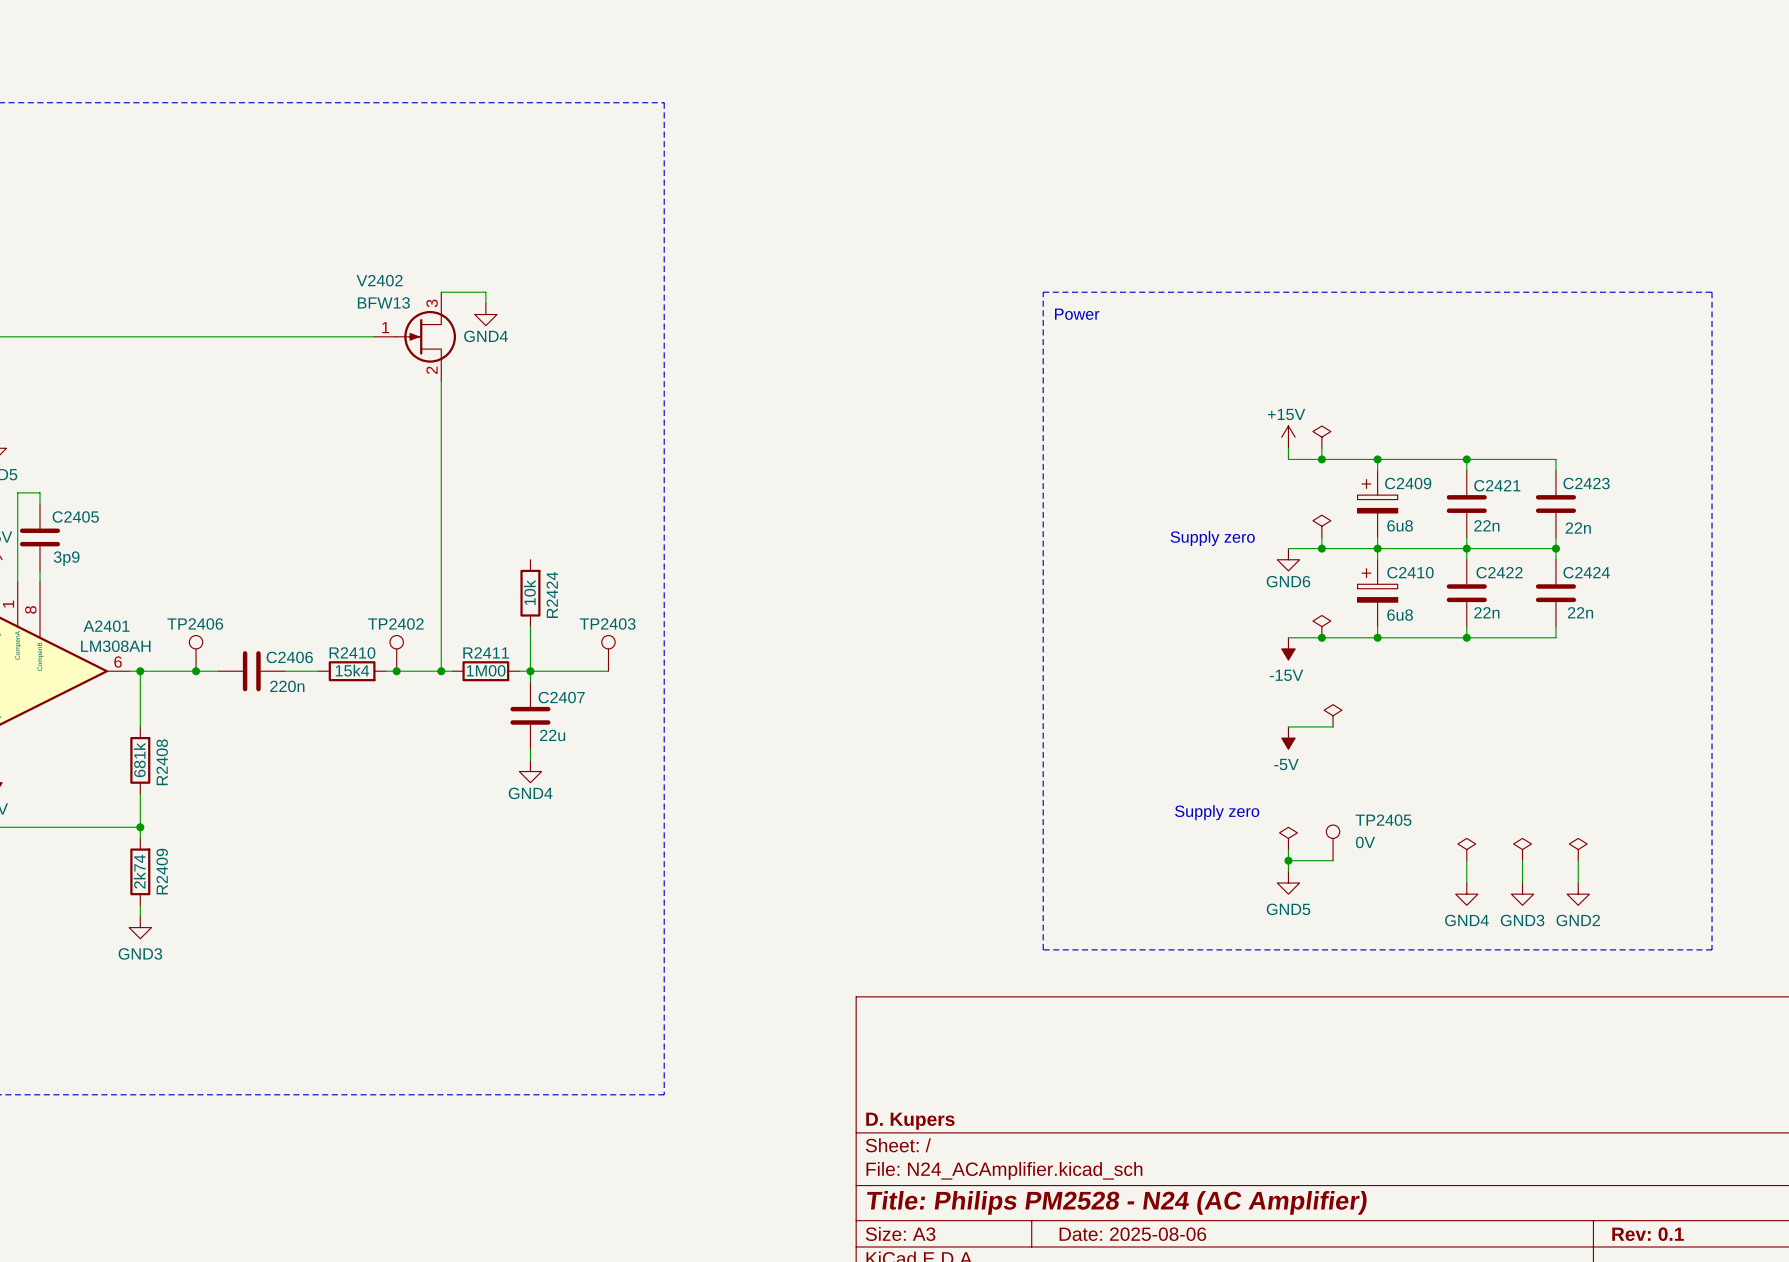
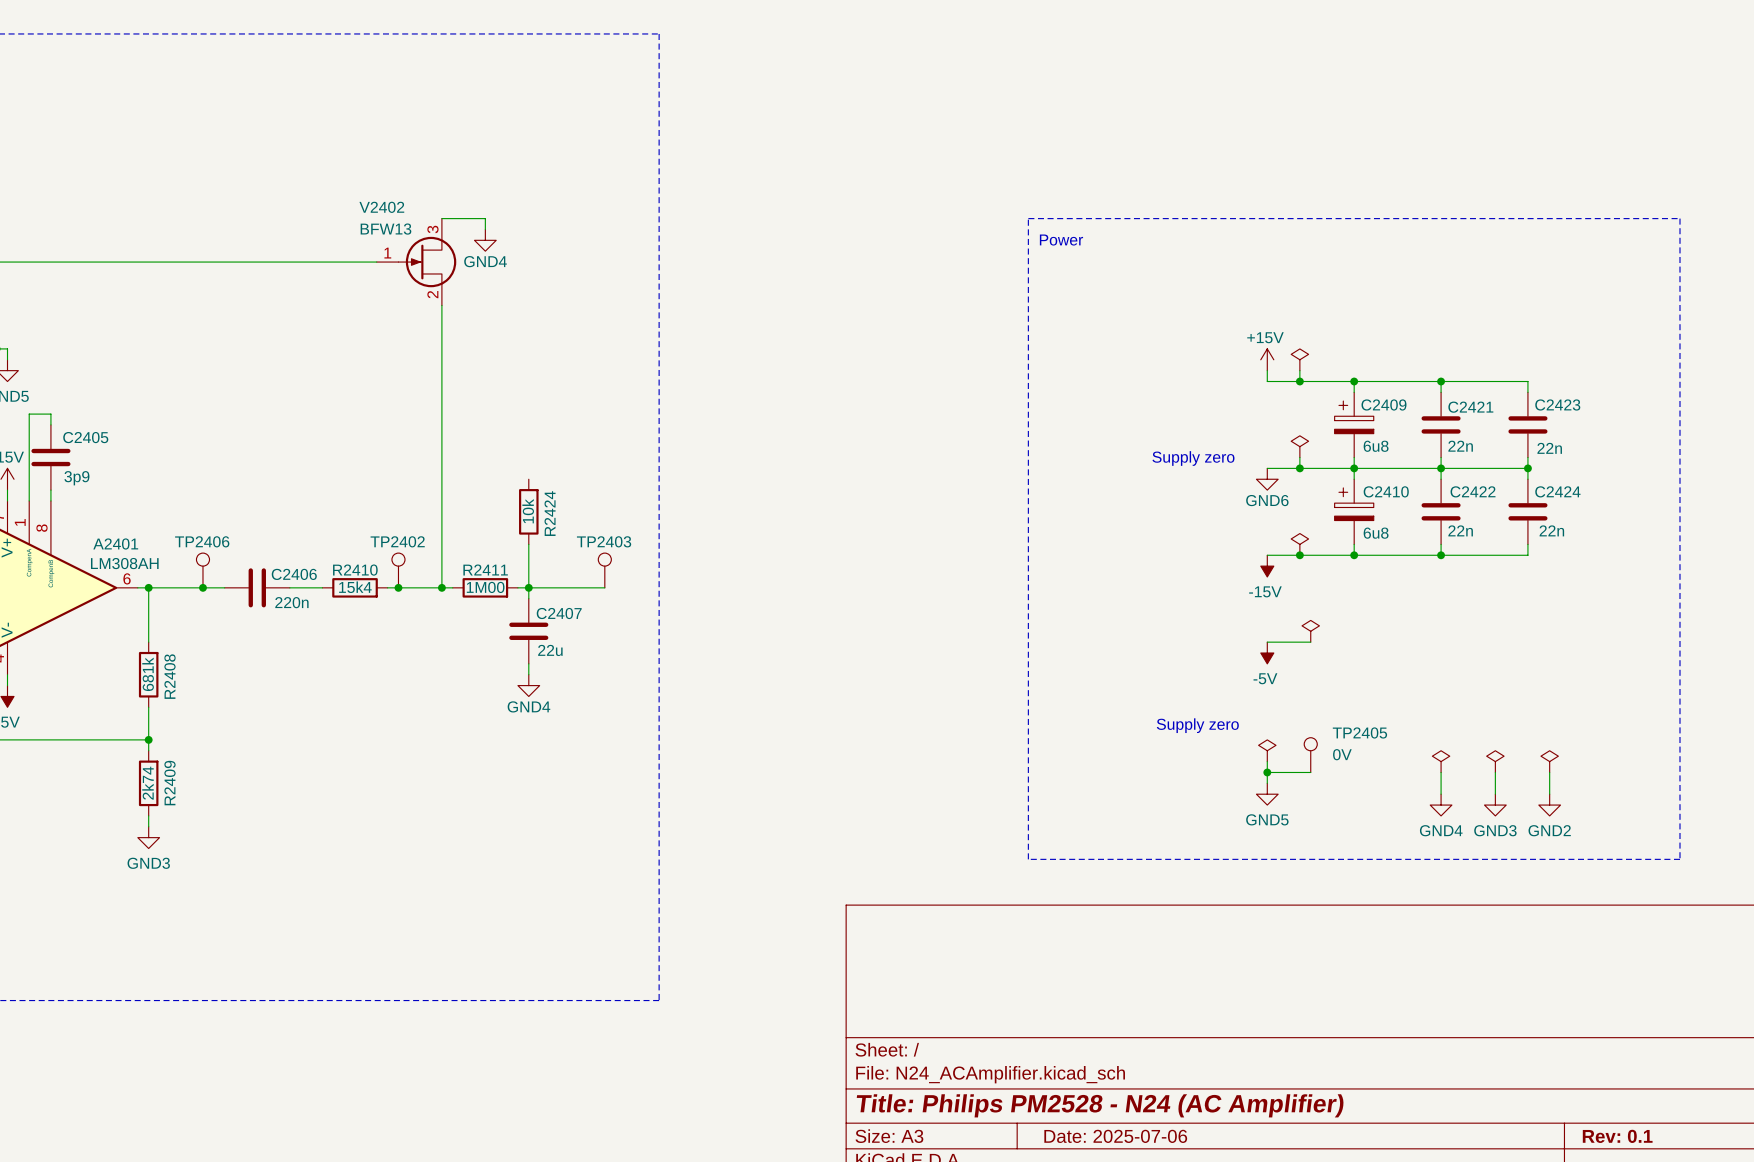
title block: D. Kupers (910, 1121) -> none
title block: Date: 2025-08-06 (1132, 1234) -> Date: 2025-07-06 (1115, 1136)

